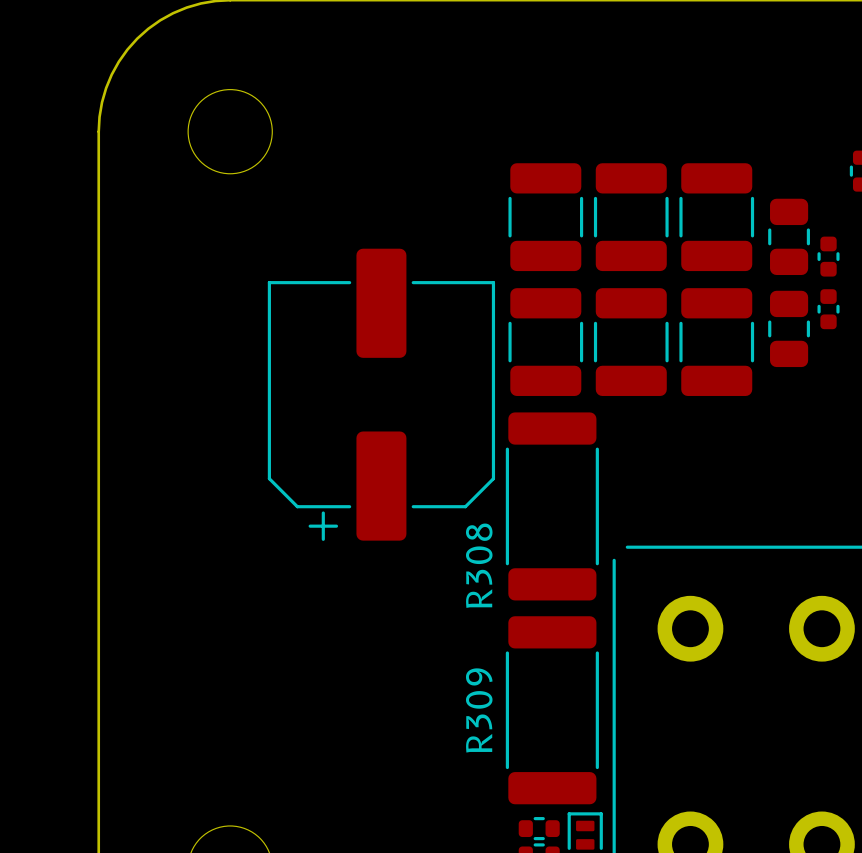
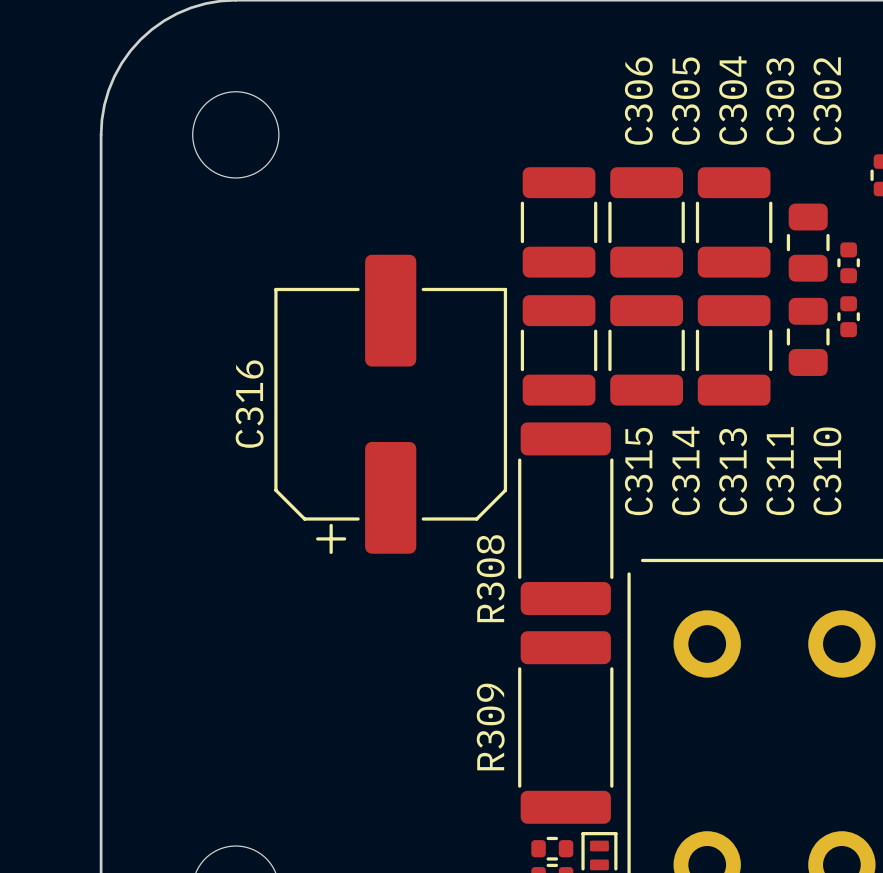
C306 name: none -> C306 (638, 101)
C304 name: none -> C304 (733, 100)
C305 name: none -> C305 (685, 101)
C303 name: none -> C303 (780, 101)
C302 name: none -> C302 (827, 101)
C316 name: none -> C316 (249, 404)
C315 name: none -> C315 (638, 471)
C314 name: none -> C314 (685, 470)
C313 name: none -> C313 (733, 471)
C311 name: none -> C311 (780, 471)
C310 name: none -> C310 (827, 471)

